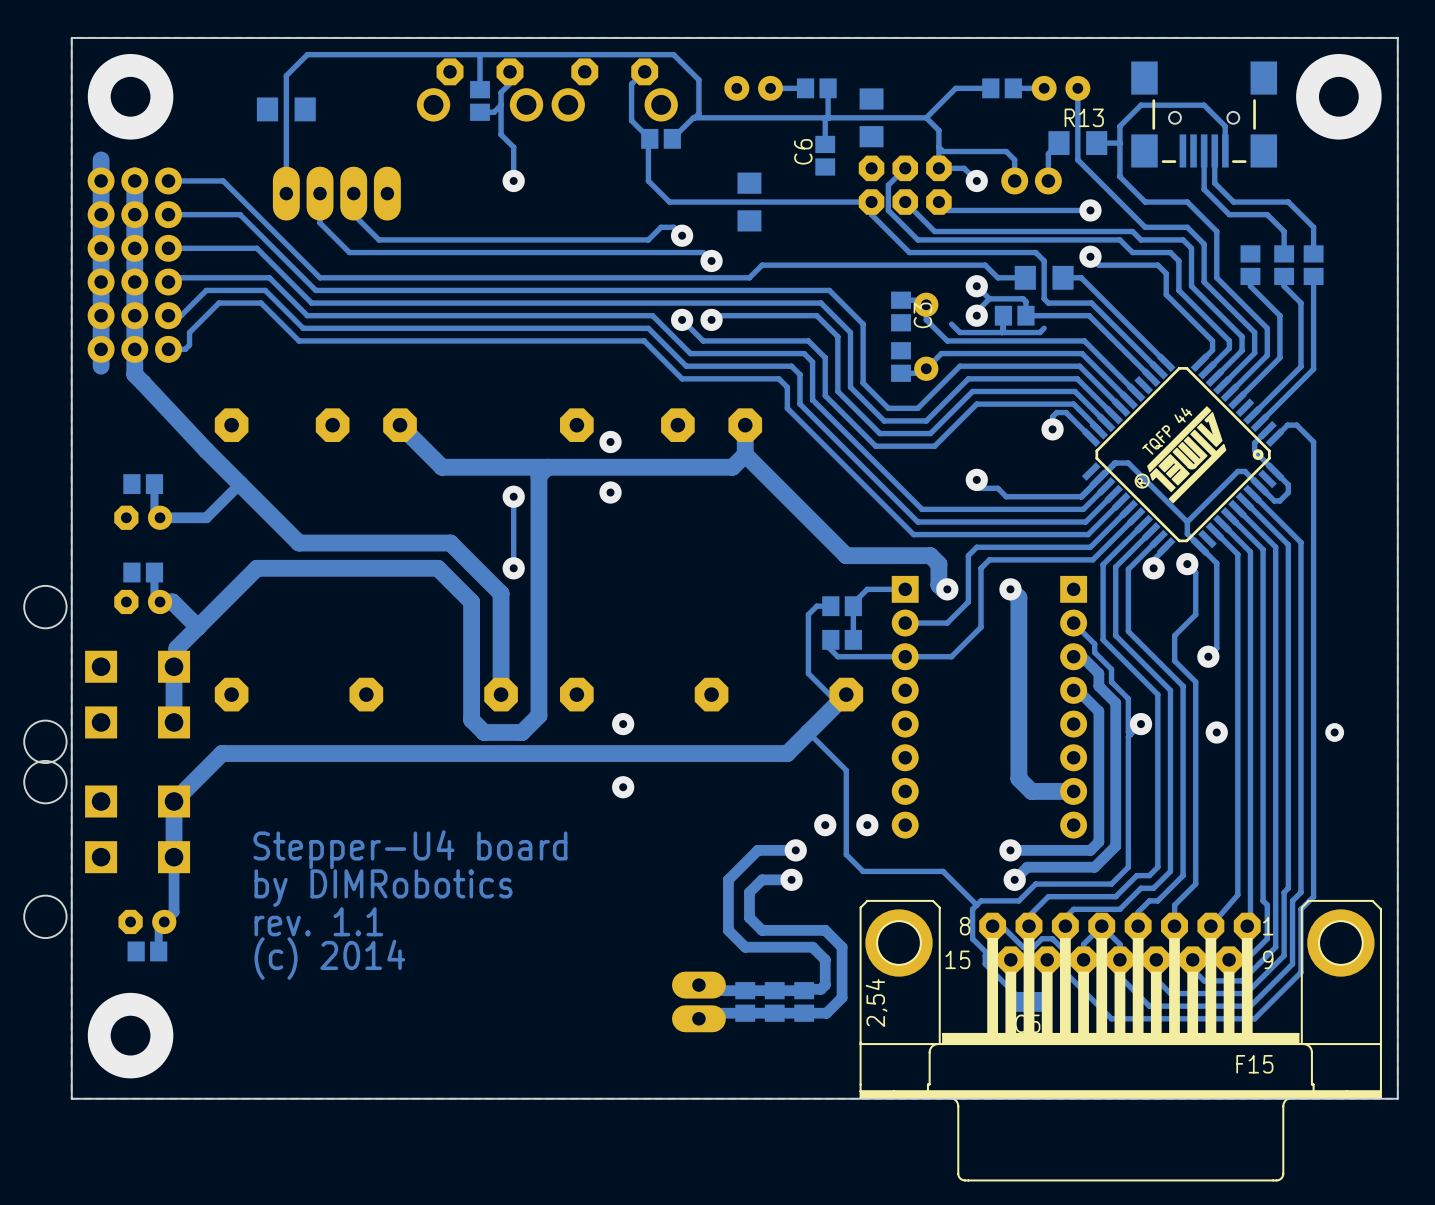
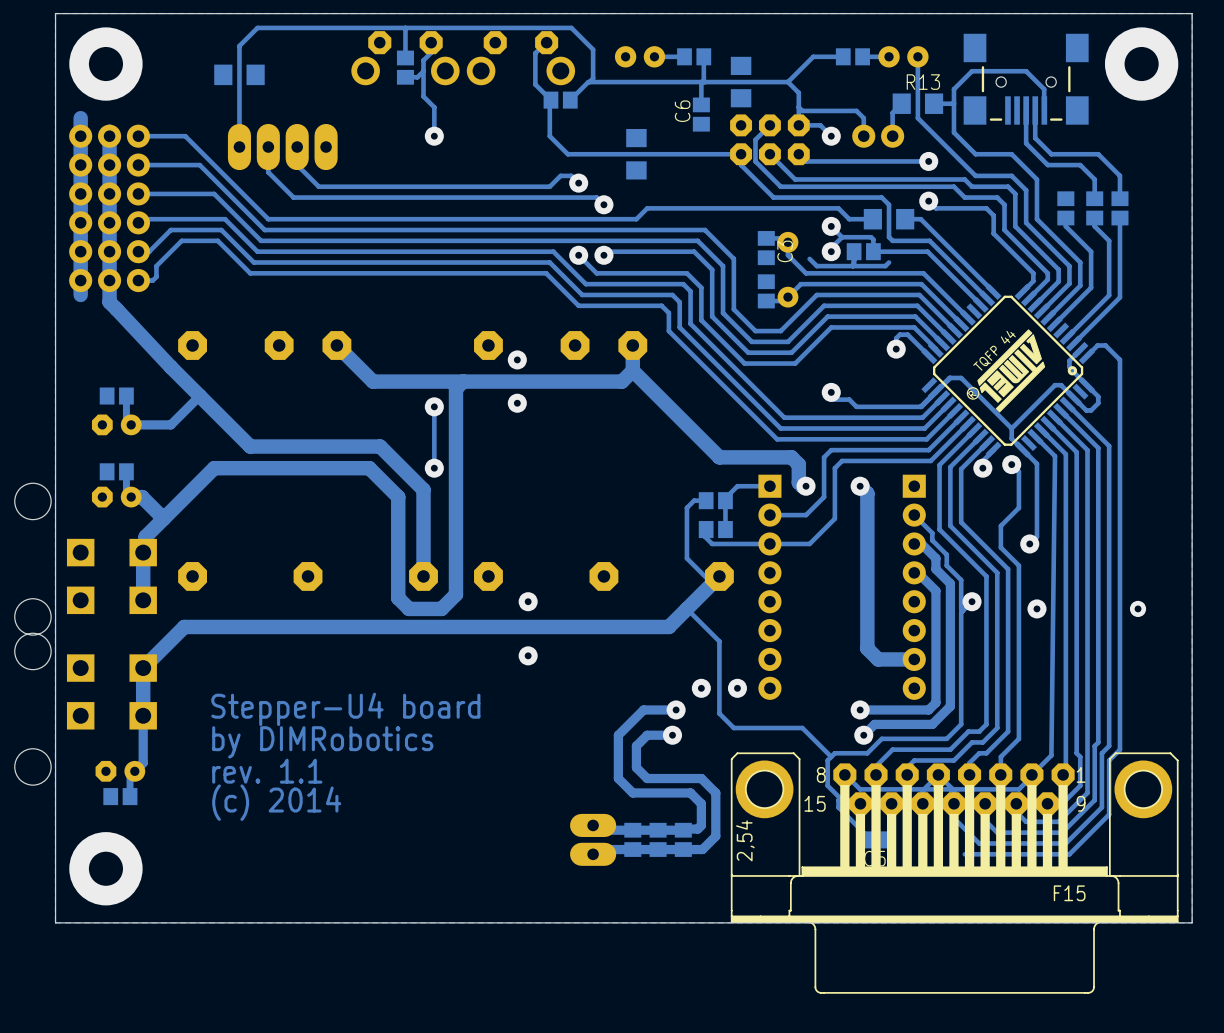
track: (1237, 554) (1237, 895) (1210, 926) -> (1055, 456) (1051, 755) (1018, 789) (952, 789)
track: (993, 926) (1002, 926) (1023, 947) (1033, 947) (1042, 938) (1052, 938) (1065, 951) (1065, 972) (1111, 1018) (1132, 1018) -> (845, 774) (860, 789) (951, 788)

